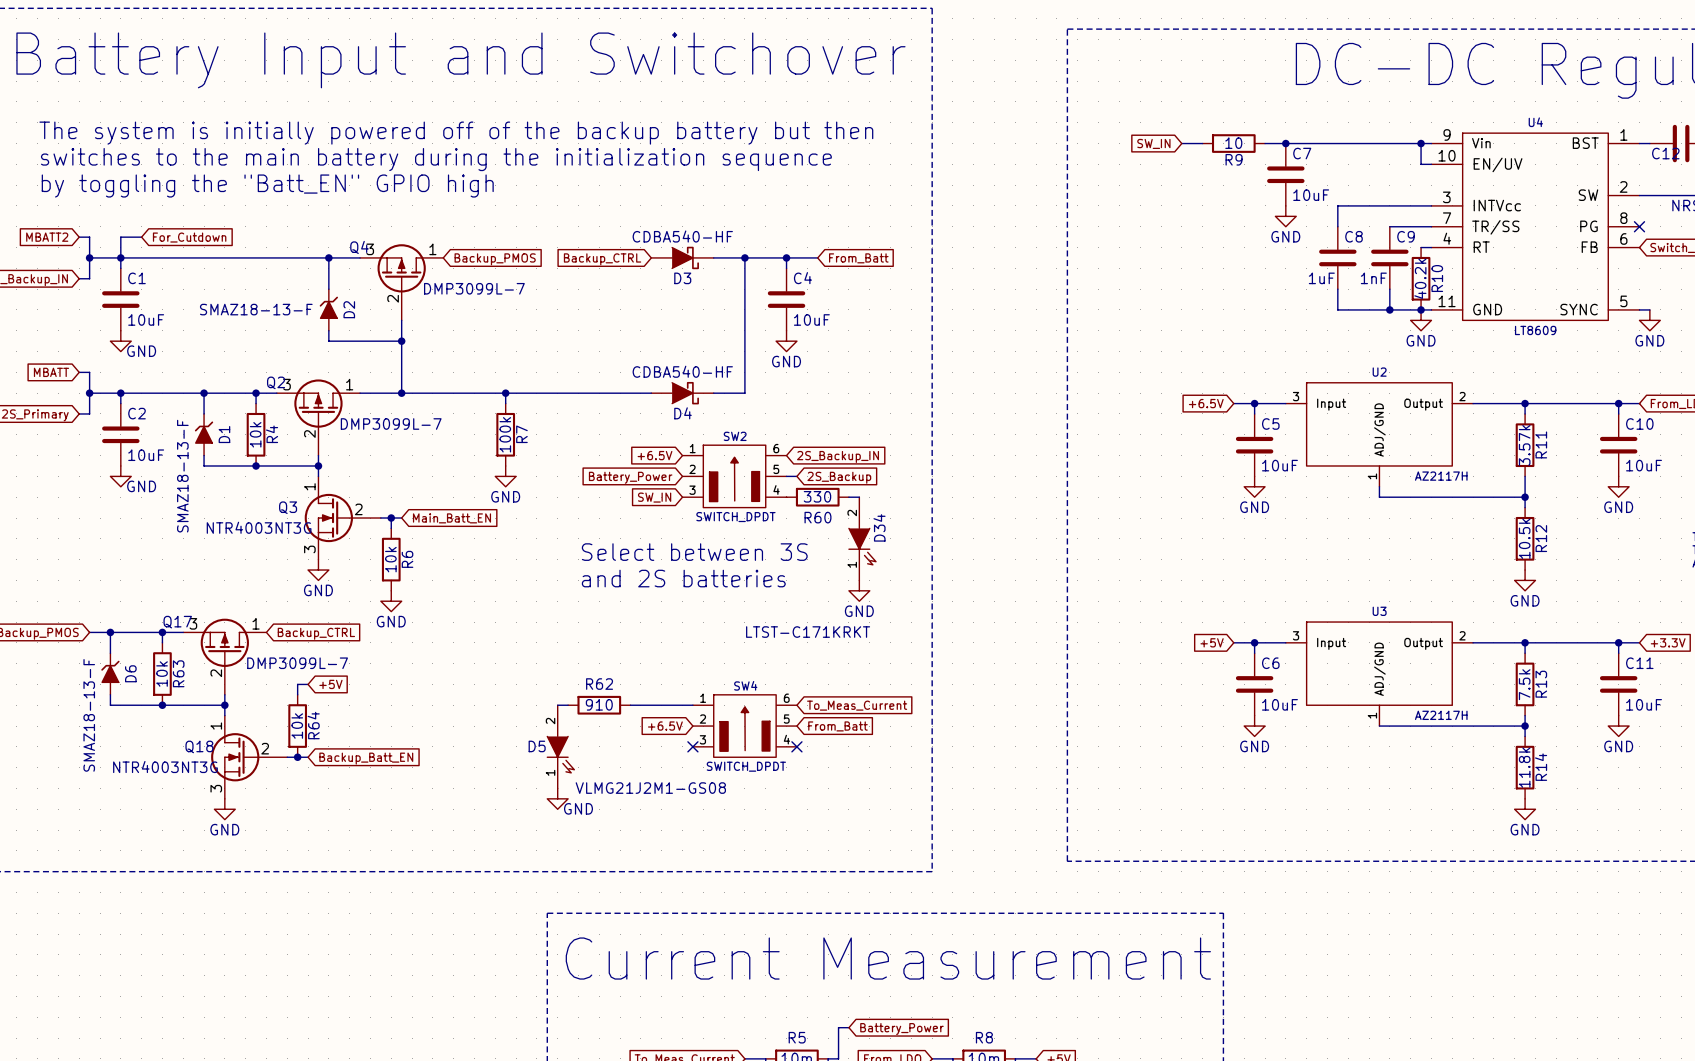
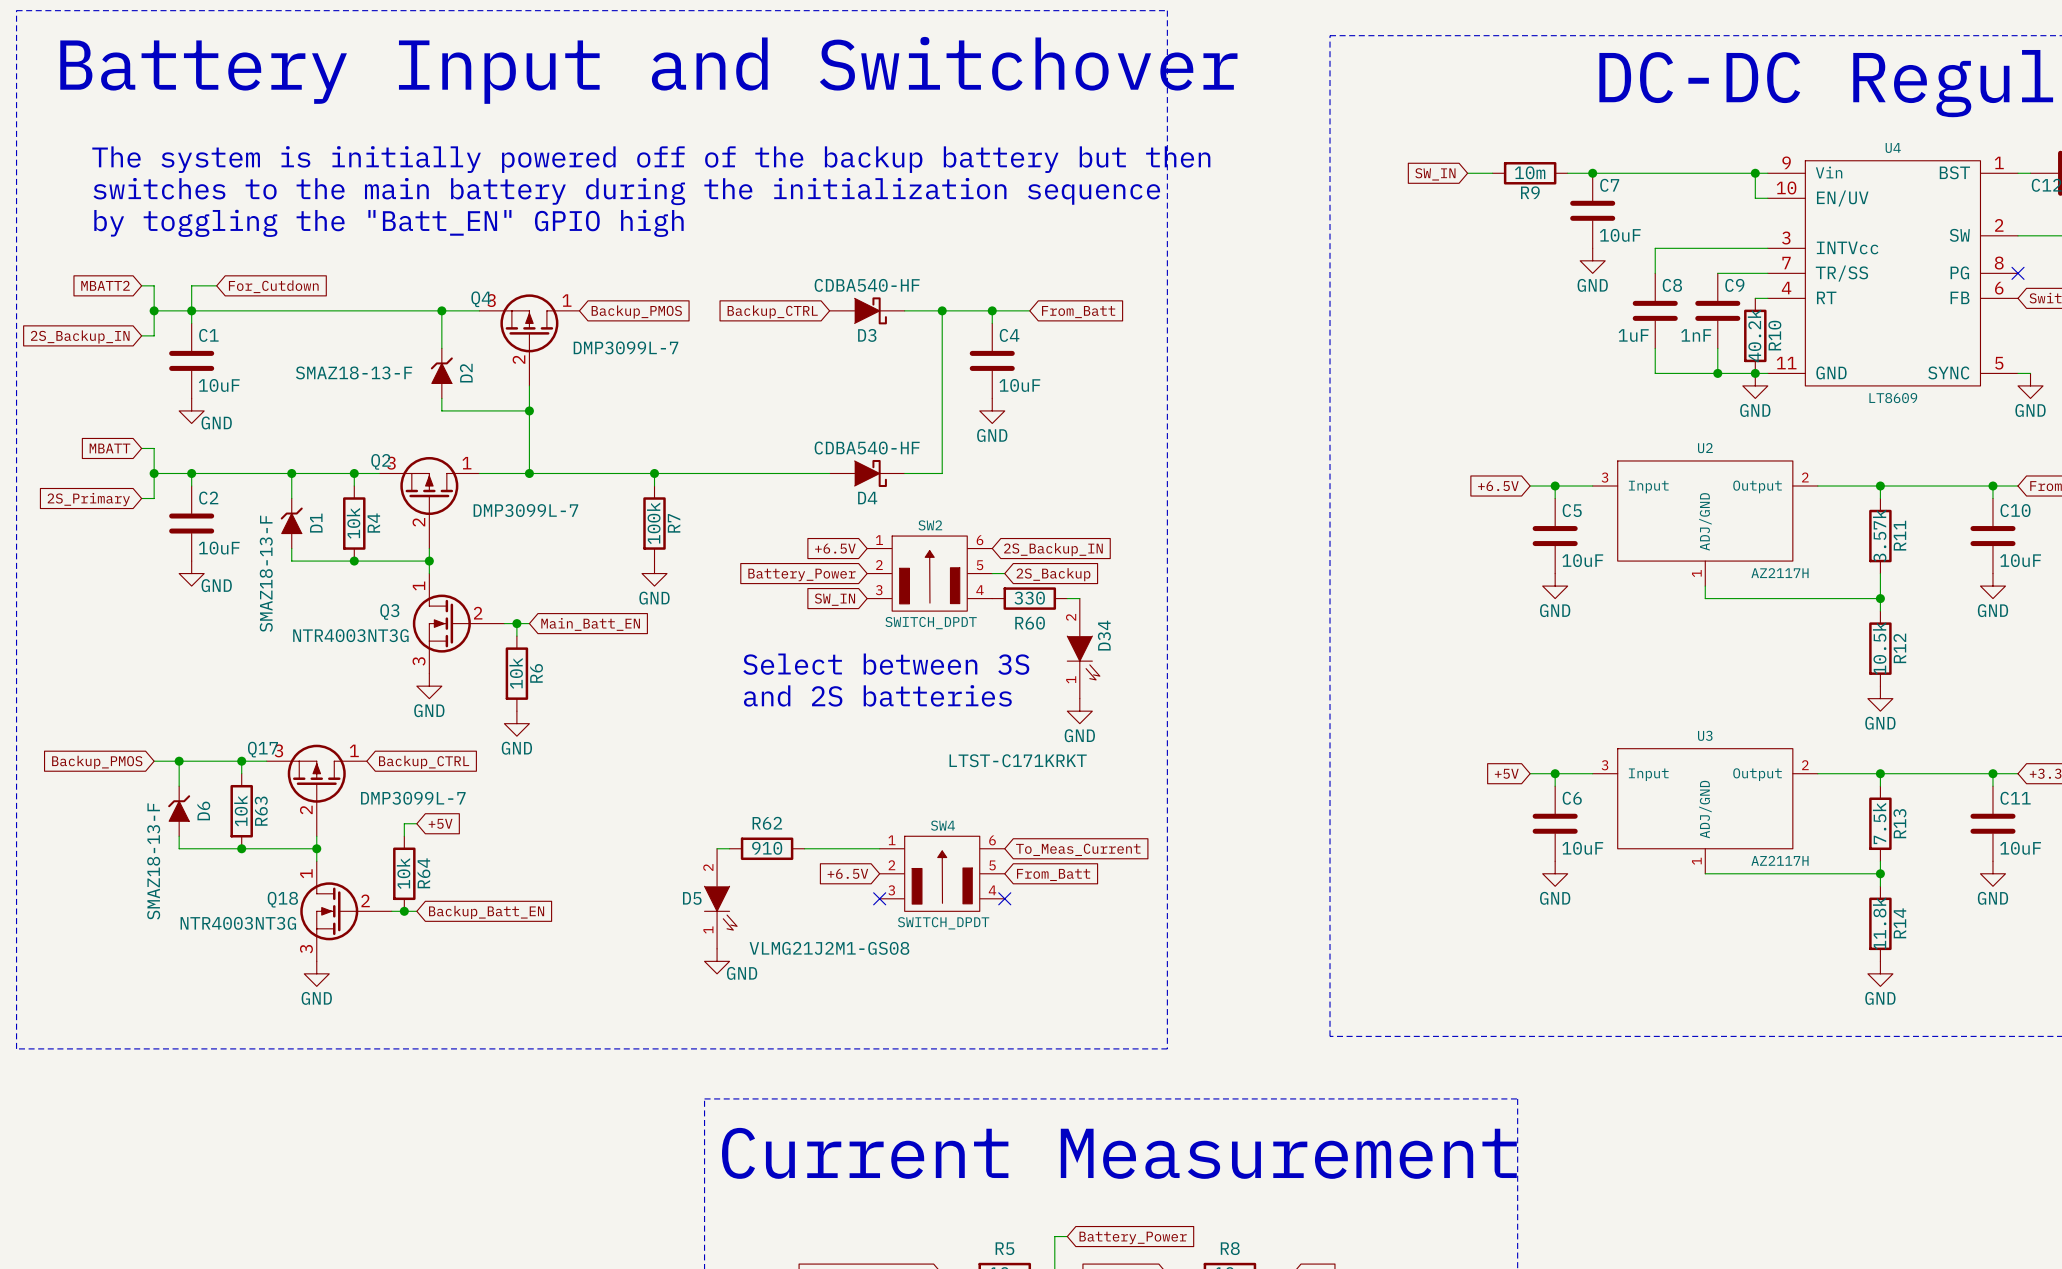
R9 value: 10 (1233, 143) -> 10m (1530, 172)

